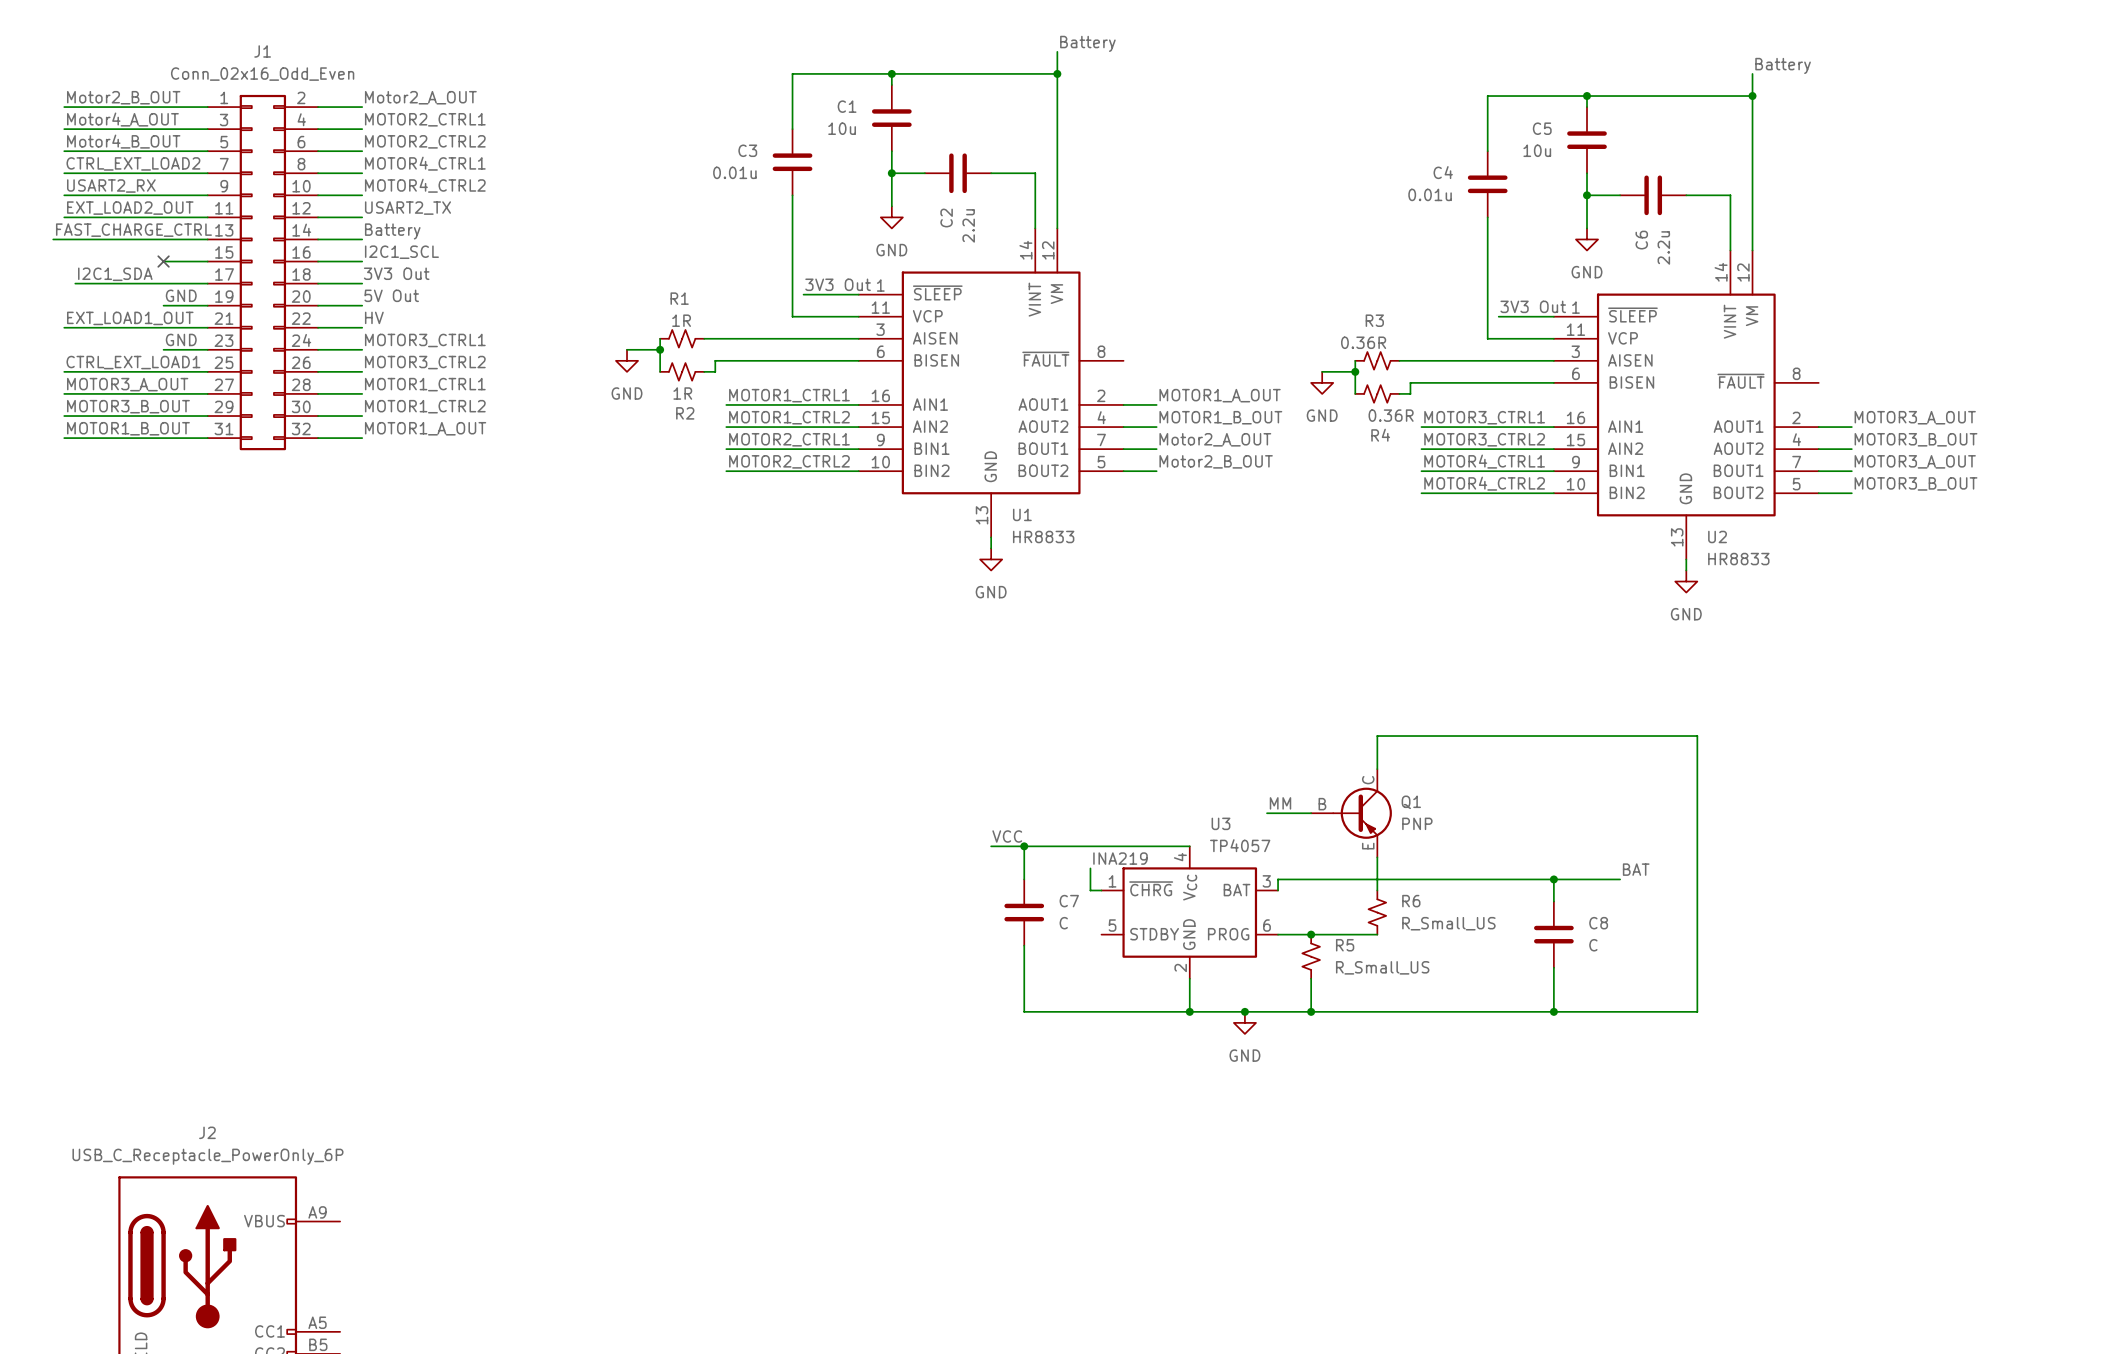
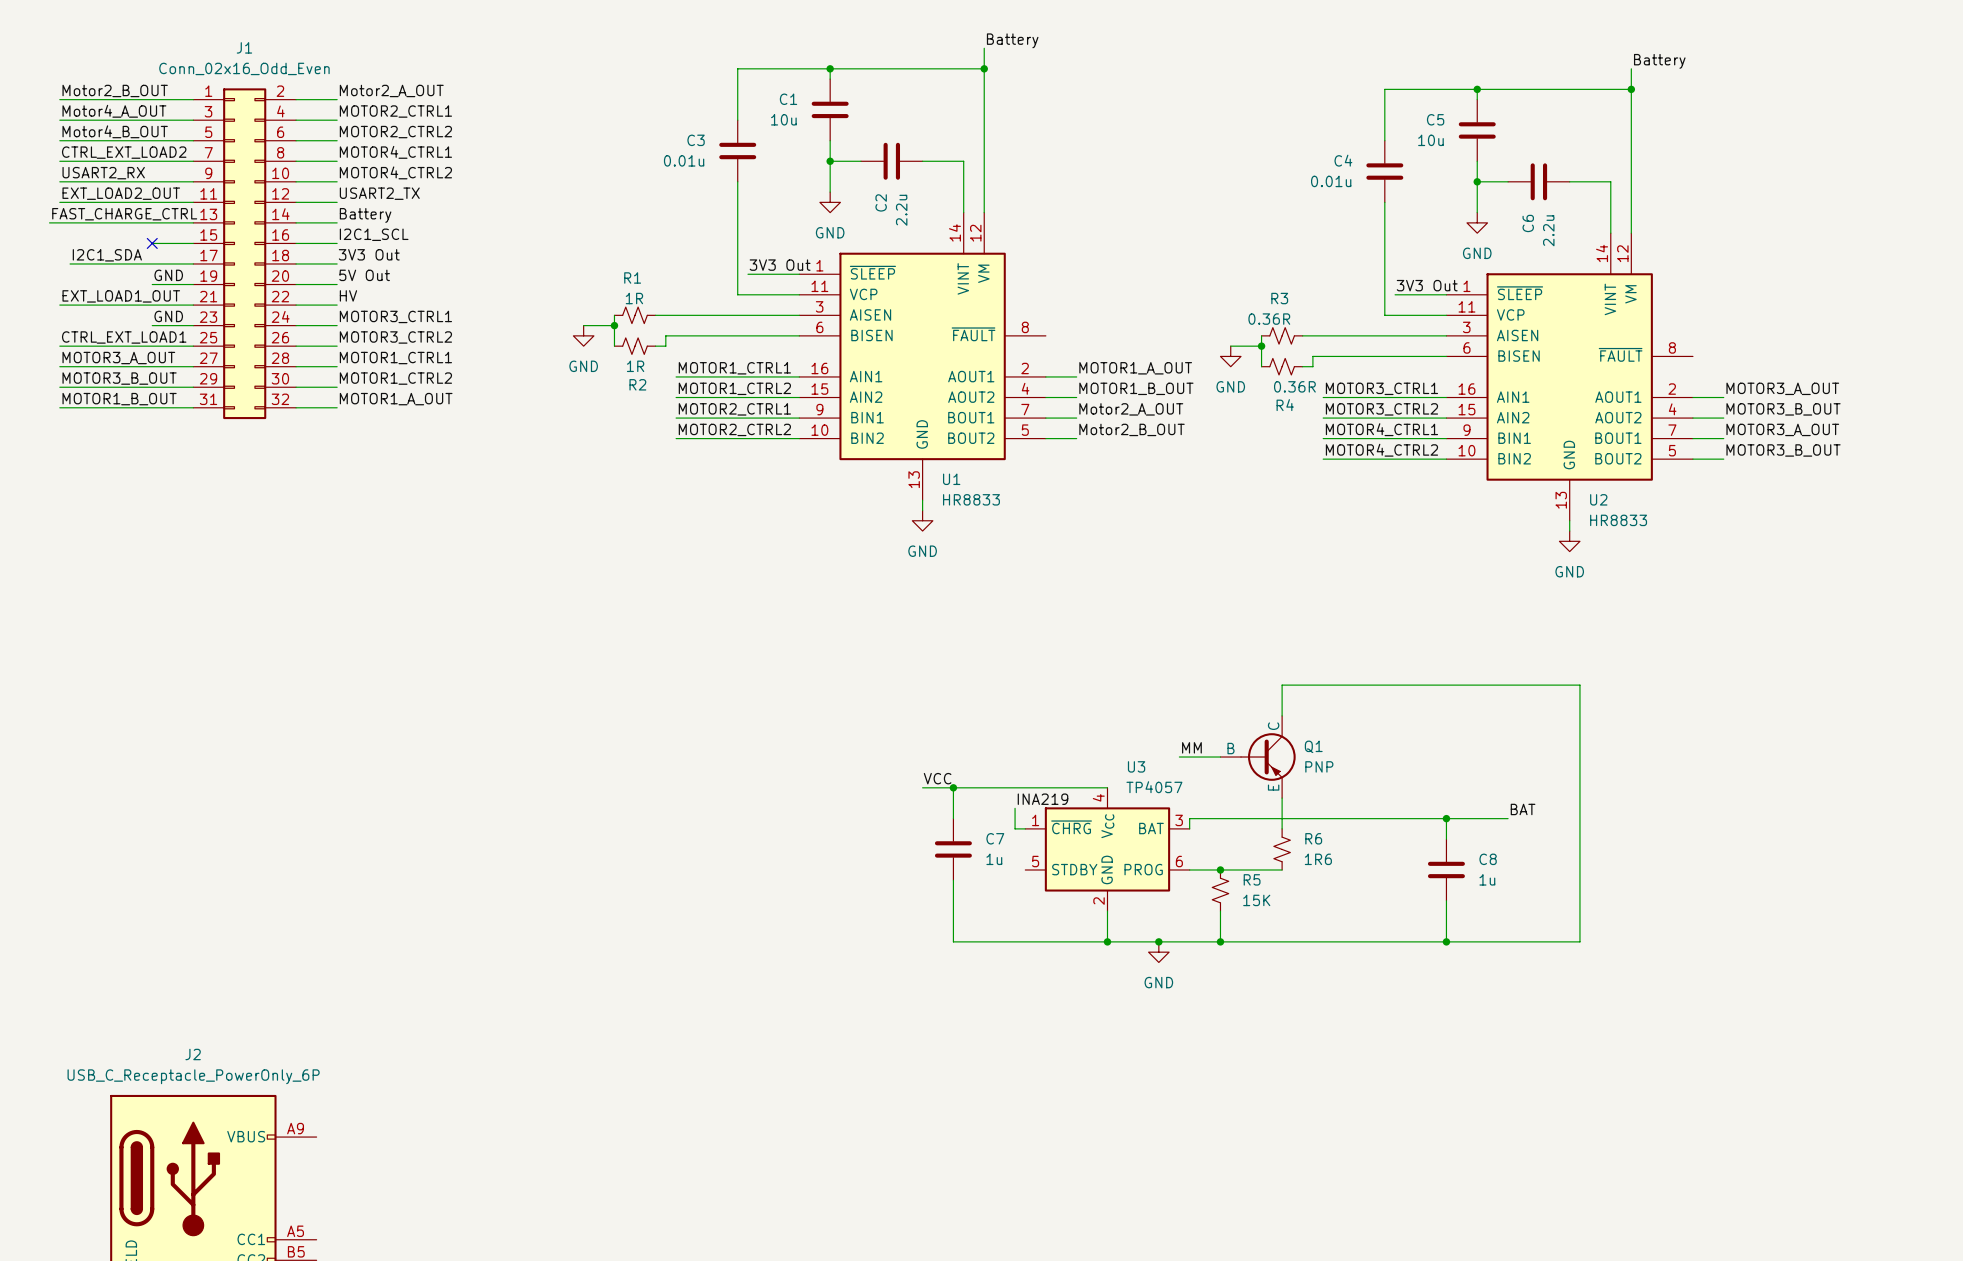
C7 value: C (1063, 923) -> 1u (994, 859)
R6 value: R_Small_US (1448, 923) -> 1R6 (1318, 859)
C8 value: C (1593, 945) -> 1u (1487, 879)
R5 value: R_Small_US (1382, 967) -> 15K (1256, 900)

